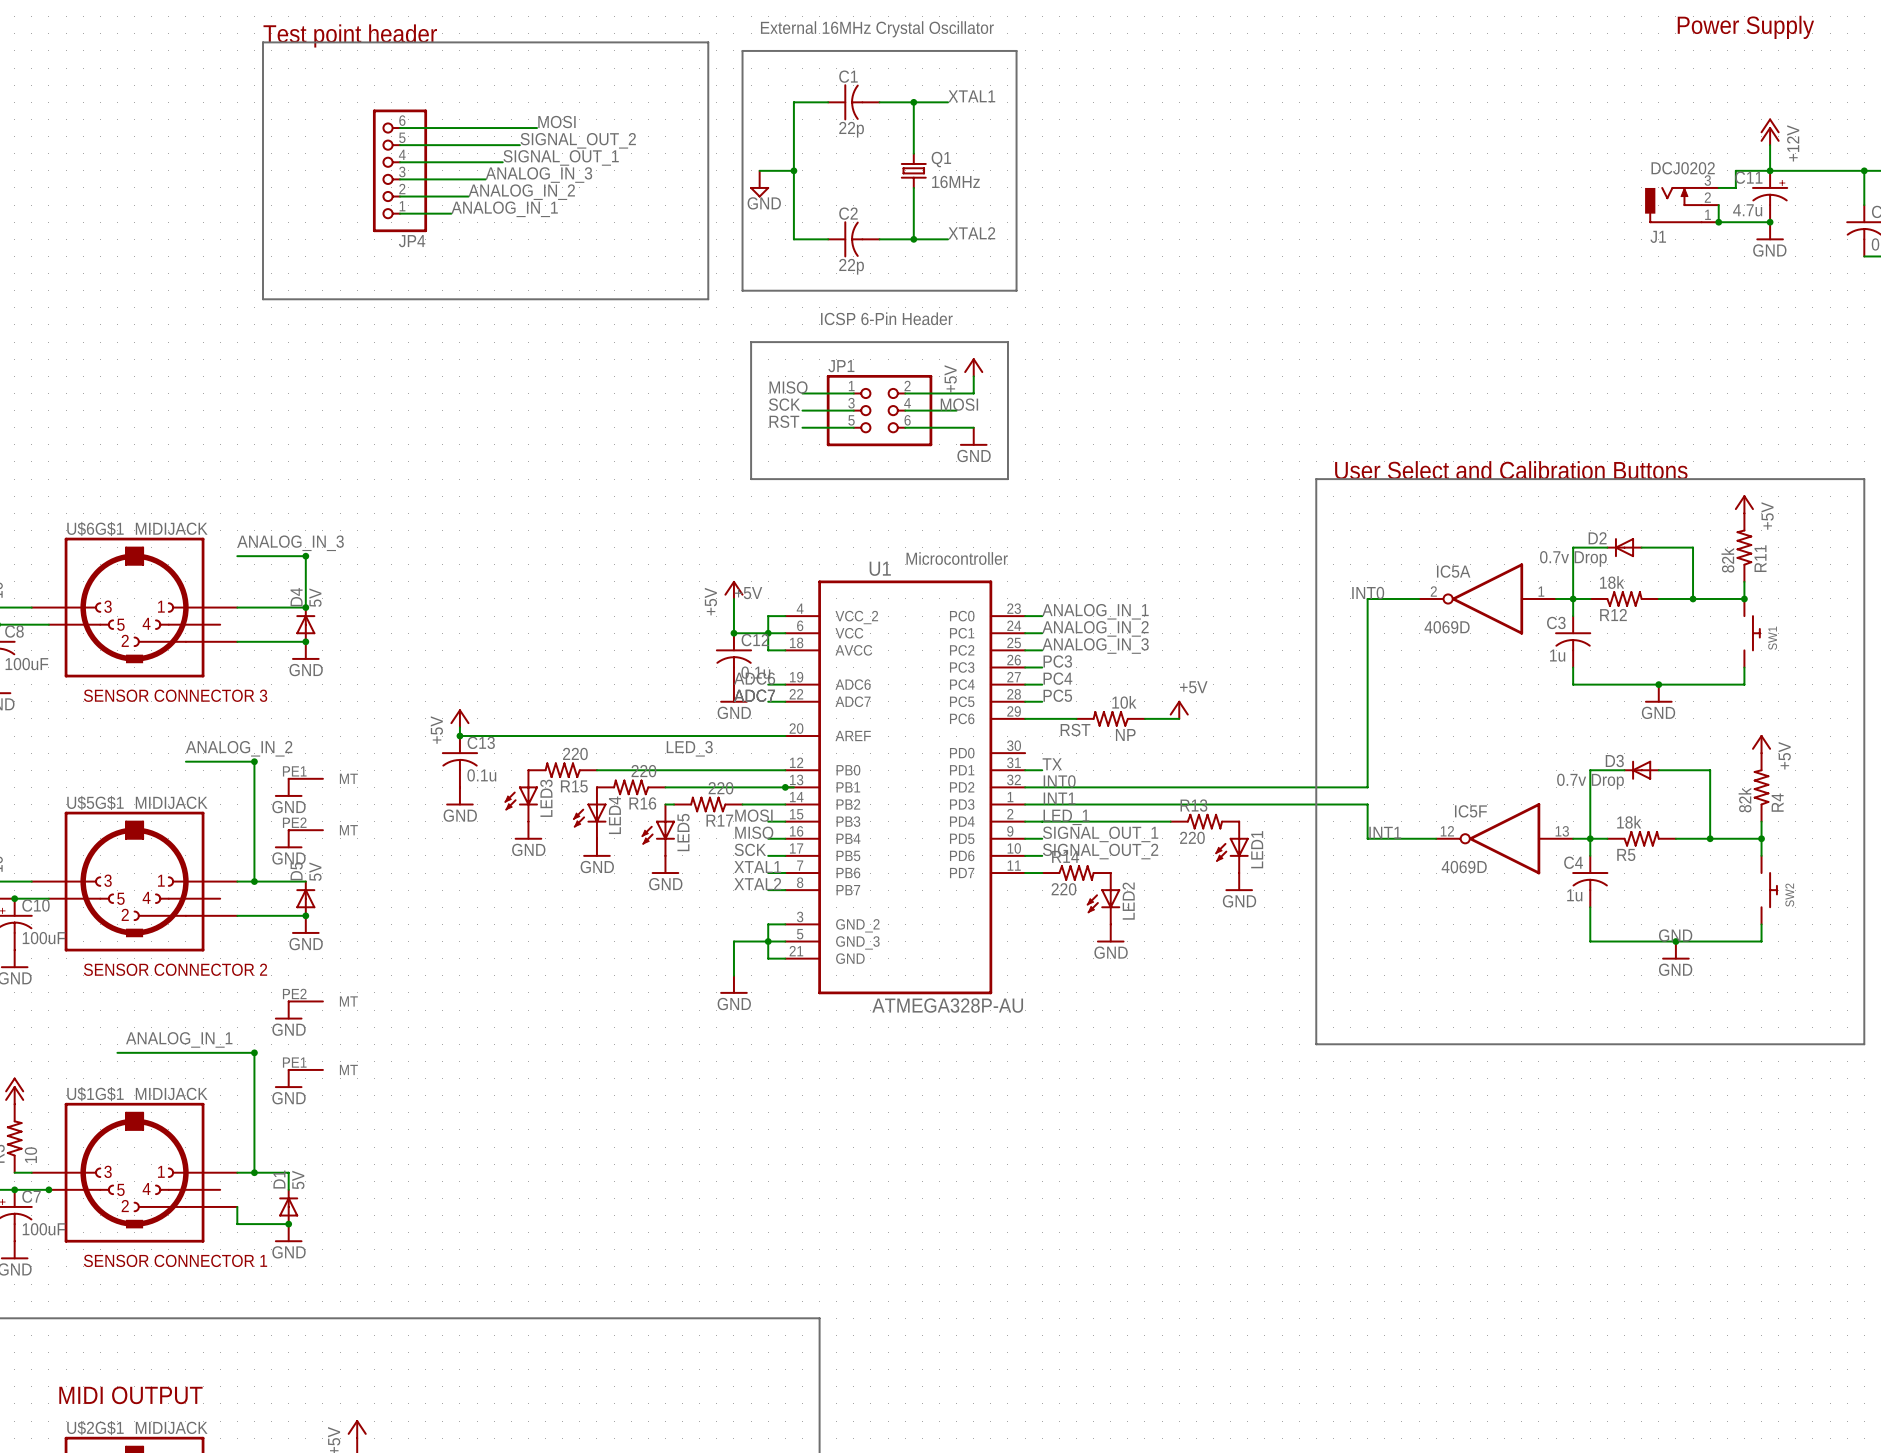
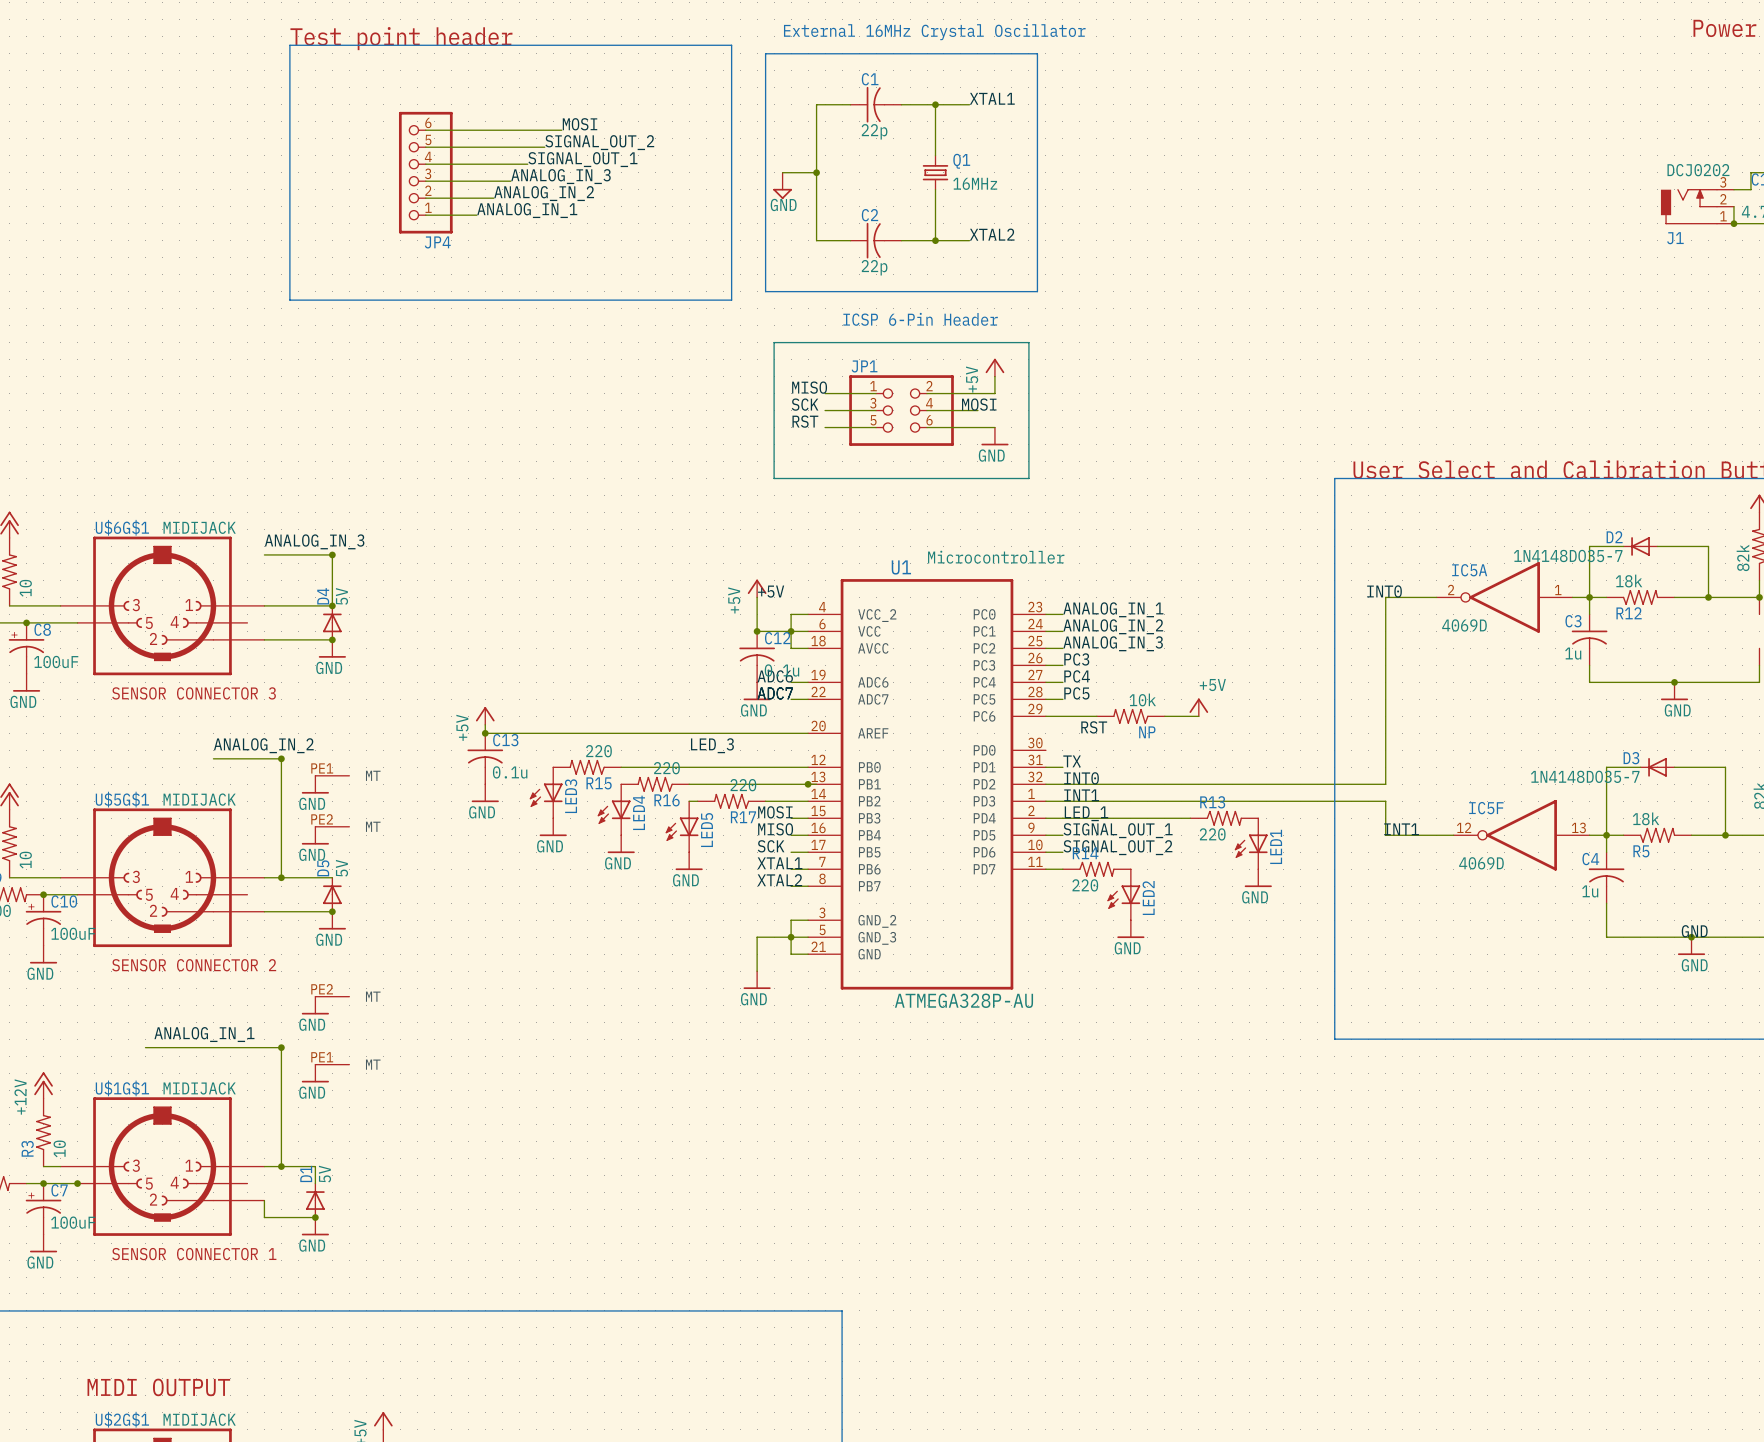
D2 value: 0.7v Drop (1573, 558) -> 1N4148DO35-7 (1568, 555)
D3 value: 0.7v Drop (1590, 781) -> 1N4148DO35-7 (1585, 776)

